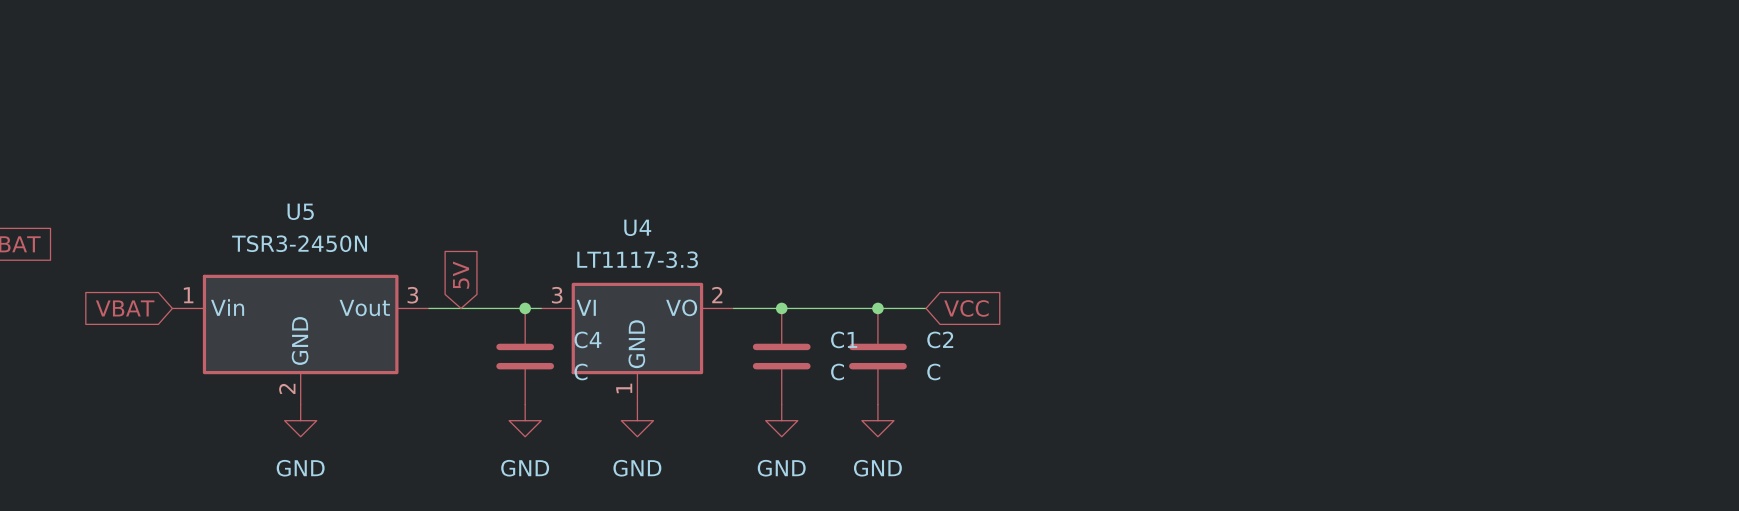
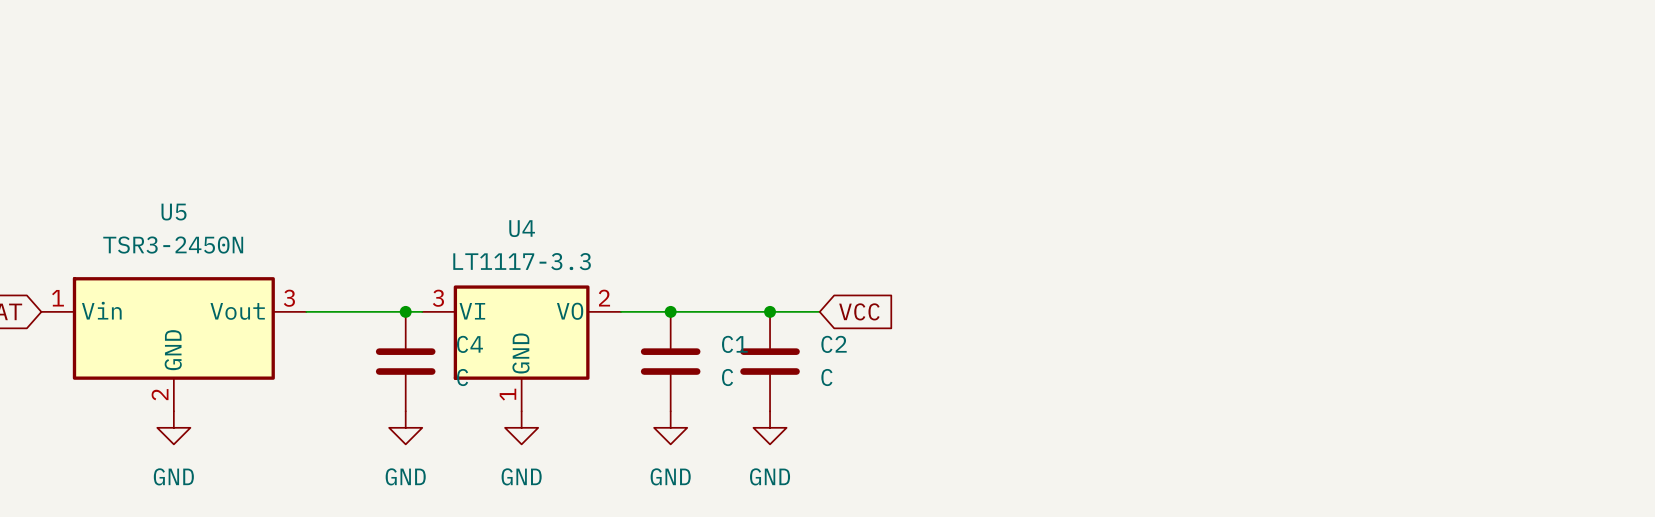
global label: 5V (461, 275) -> none

